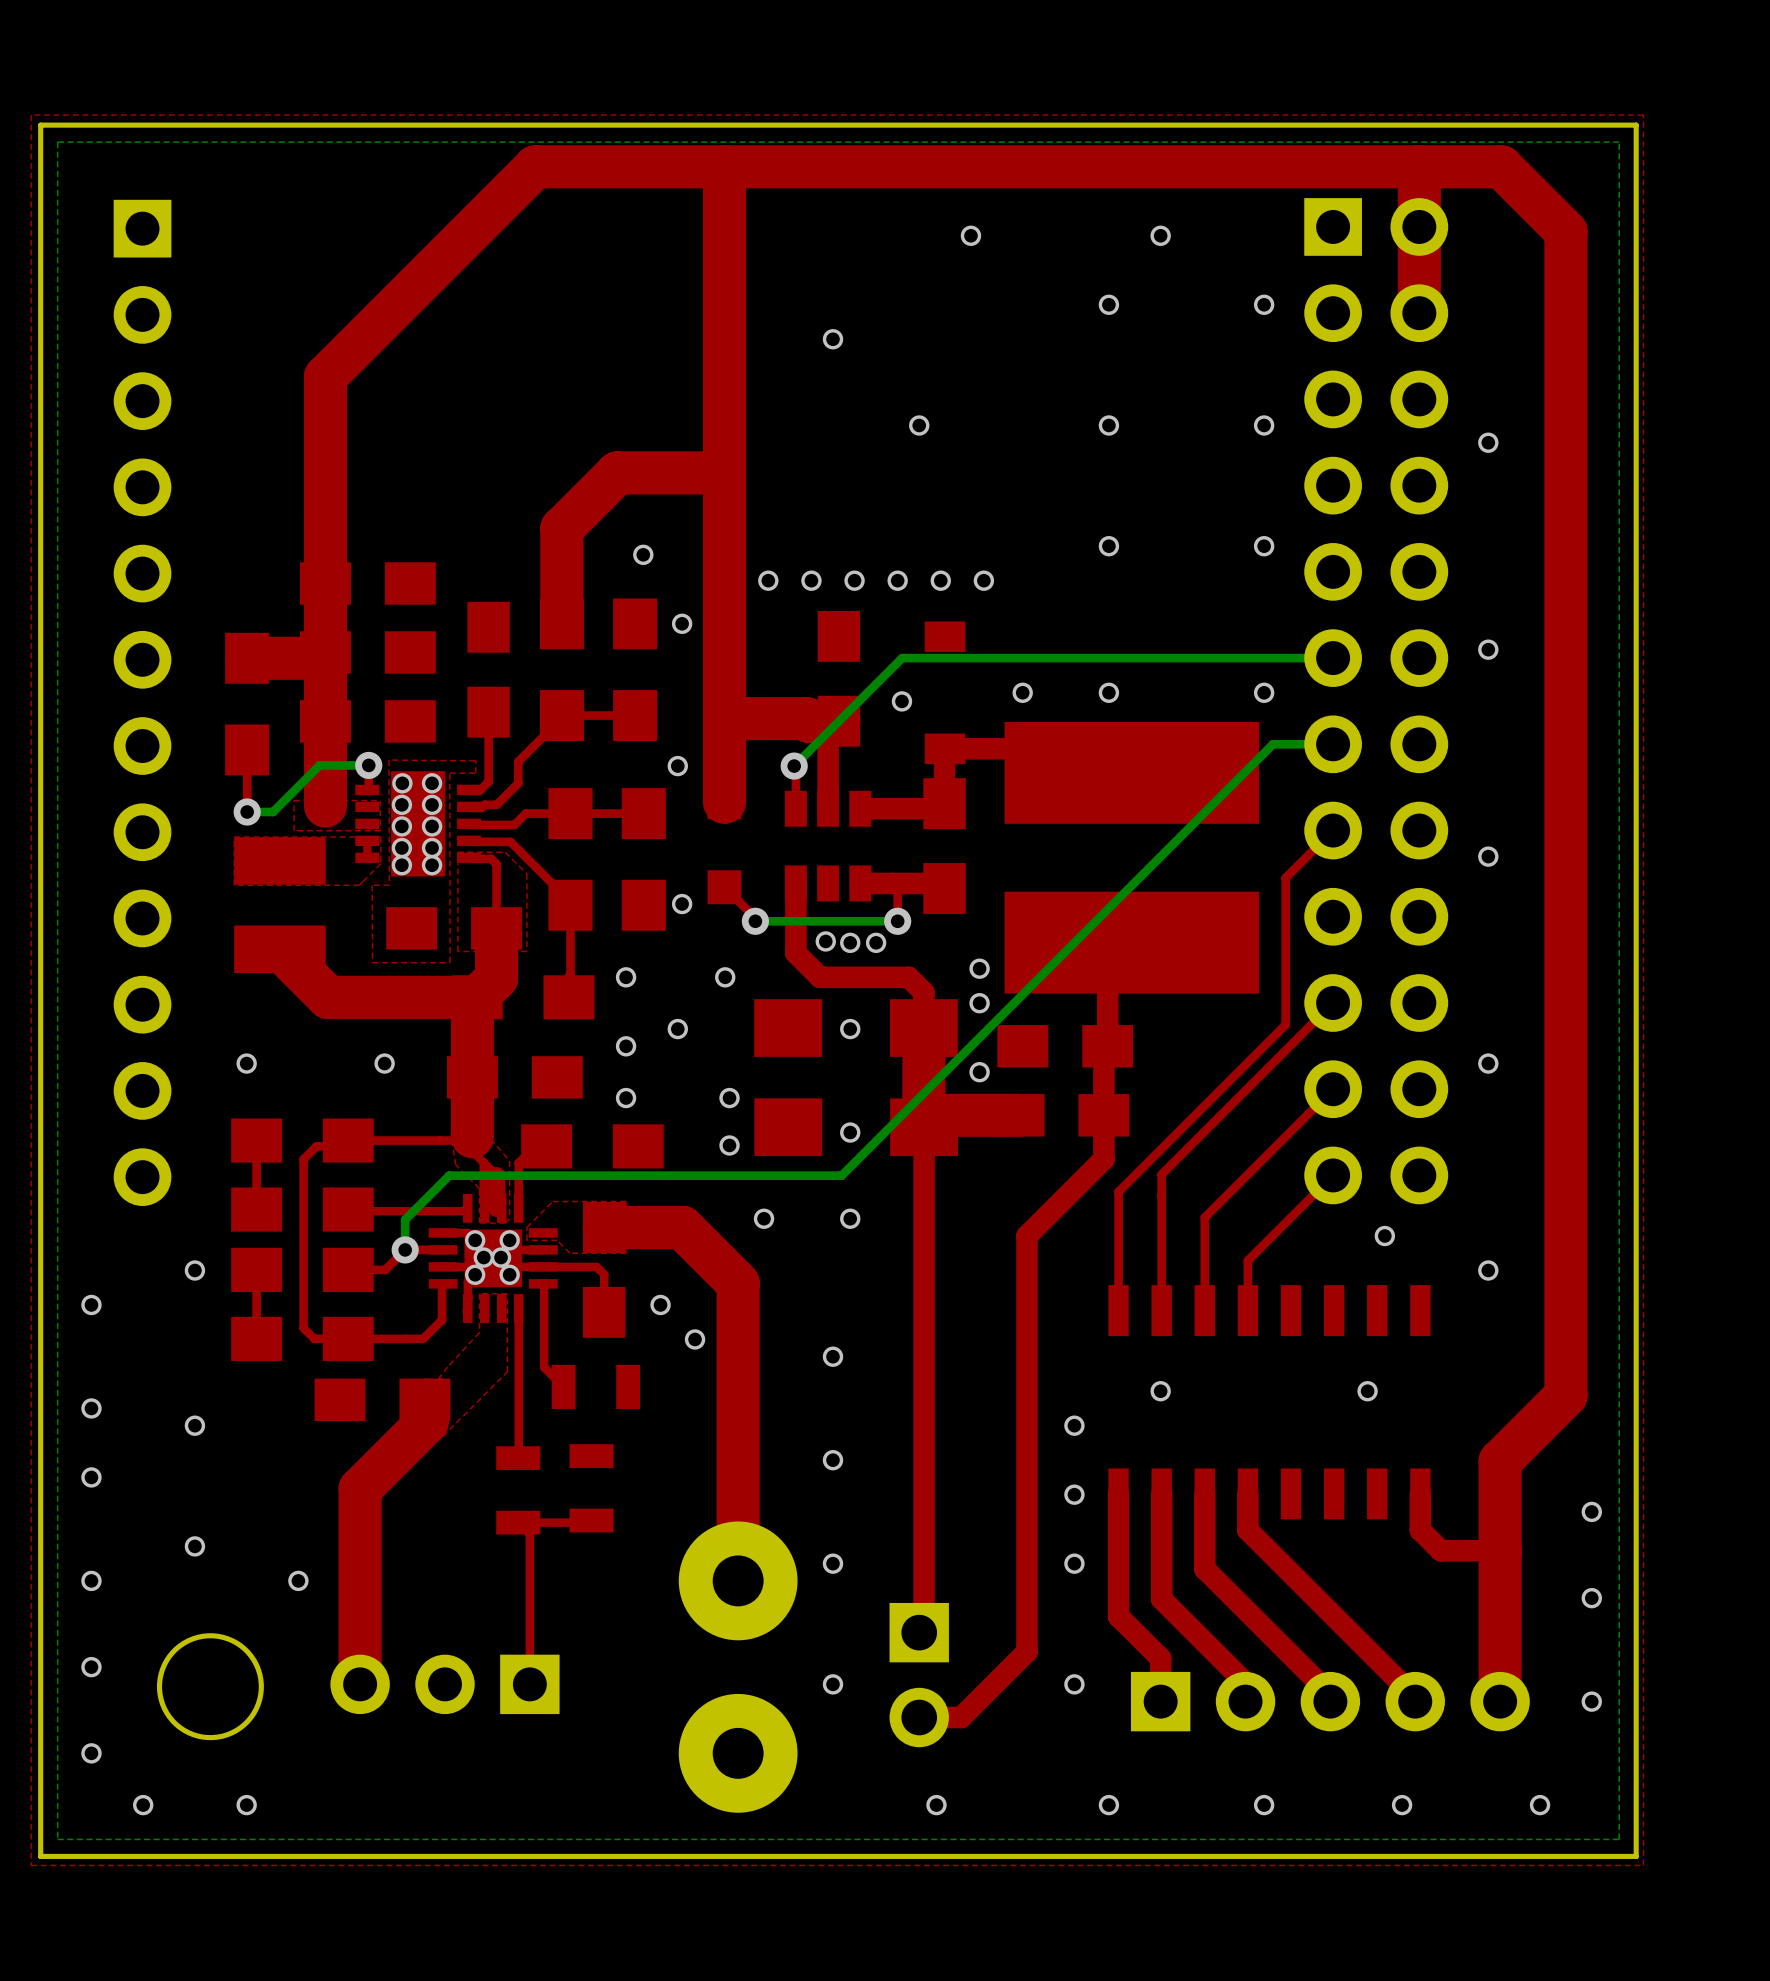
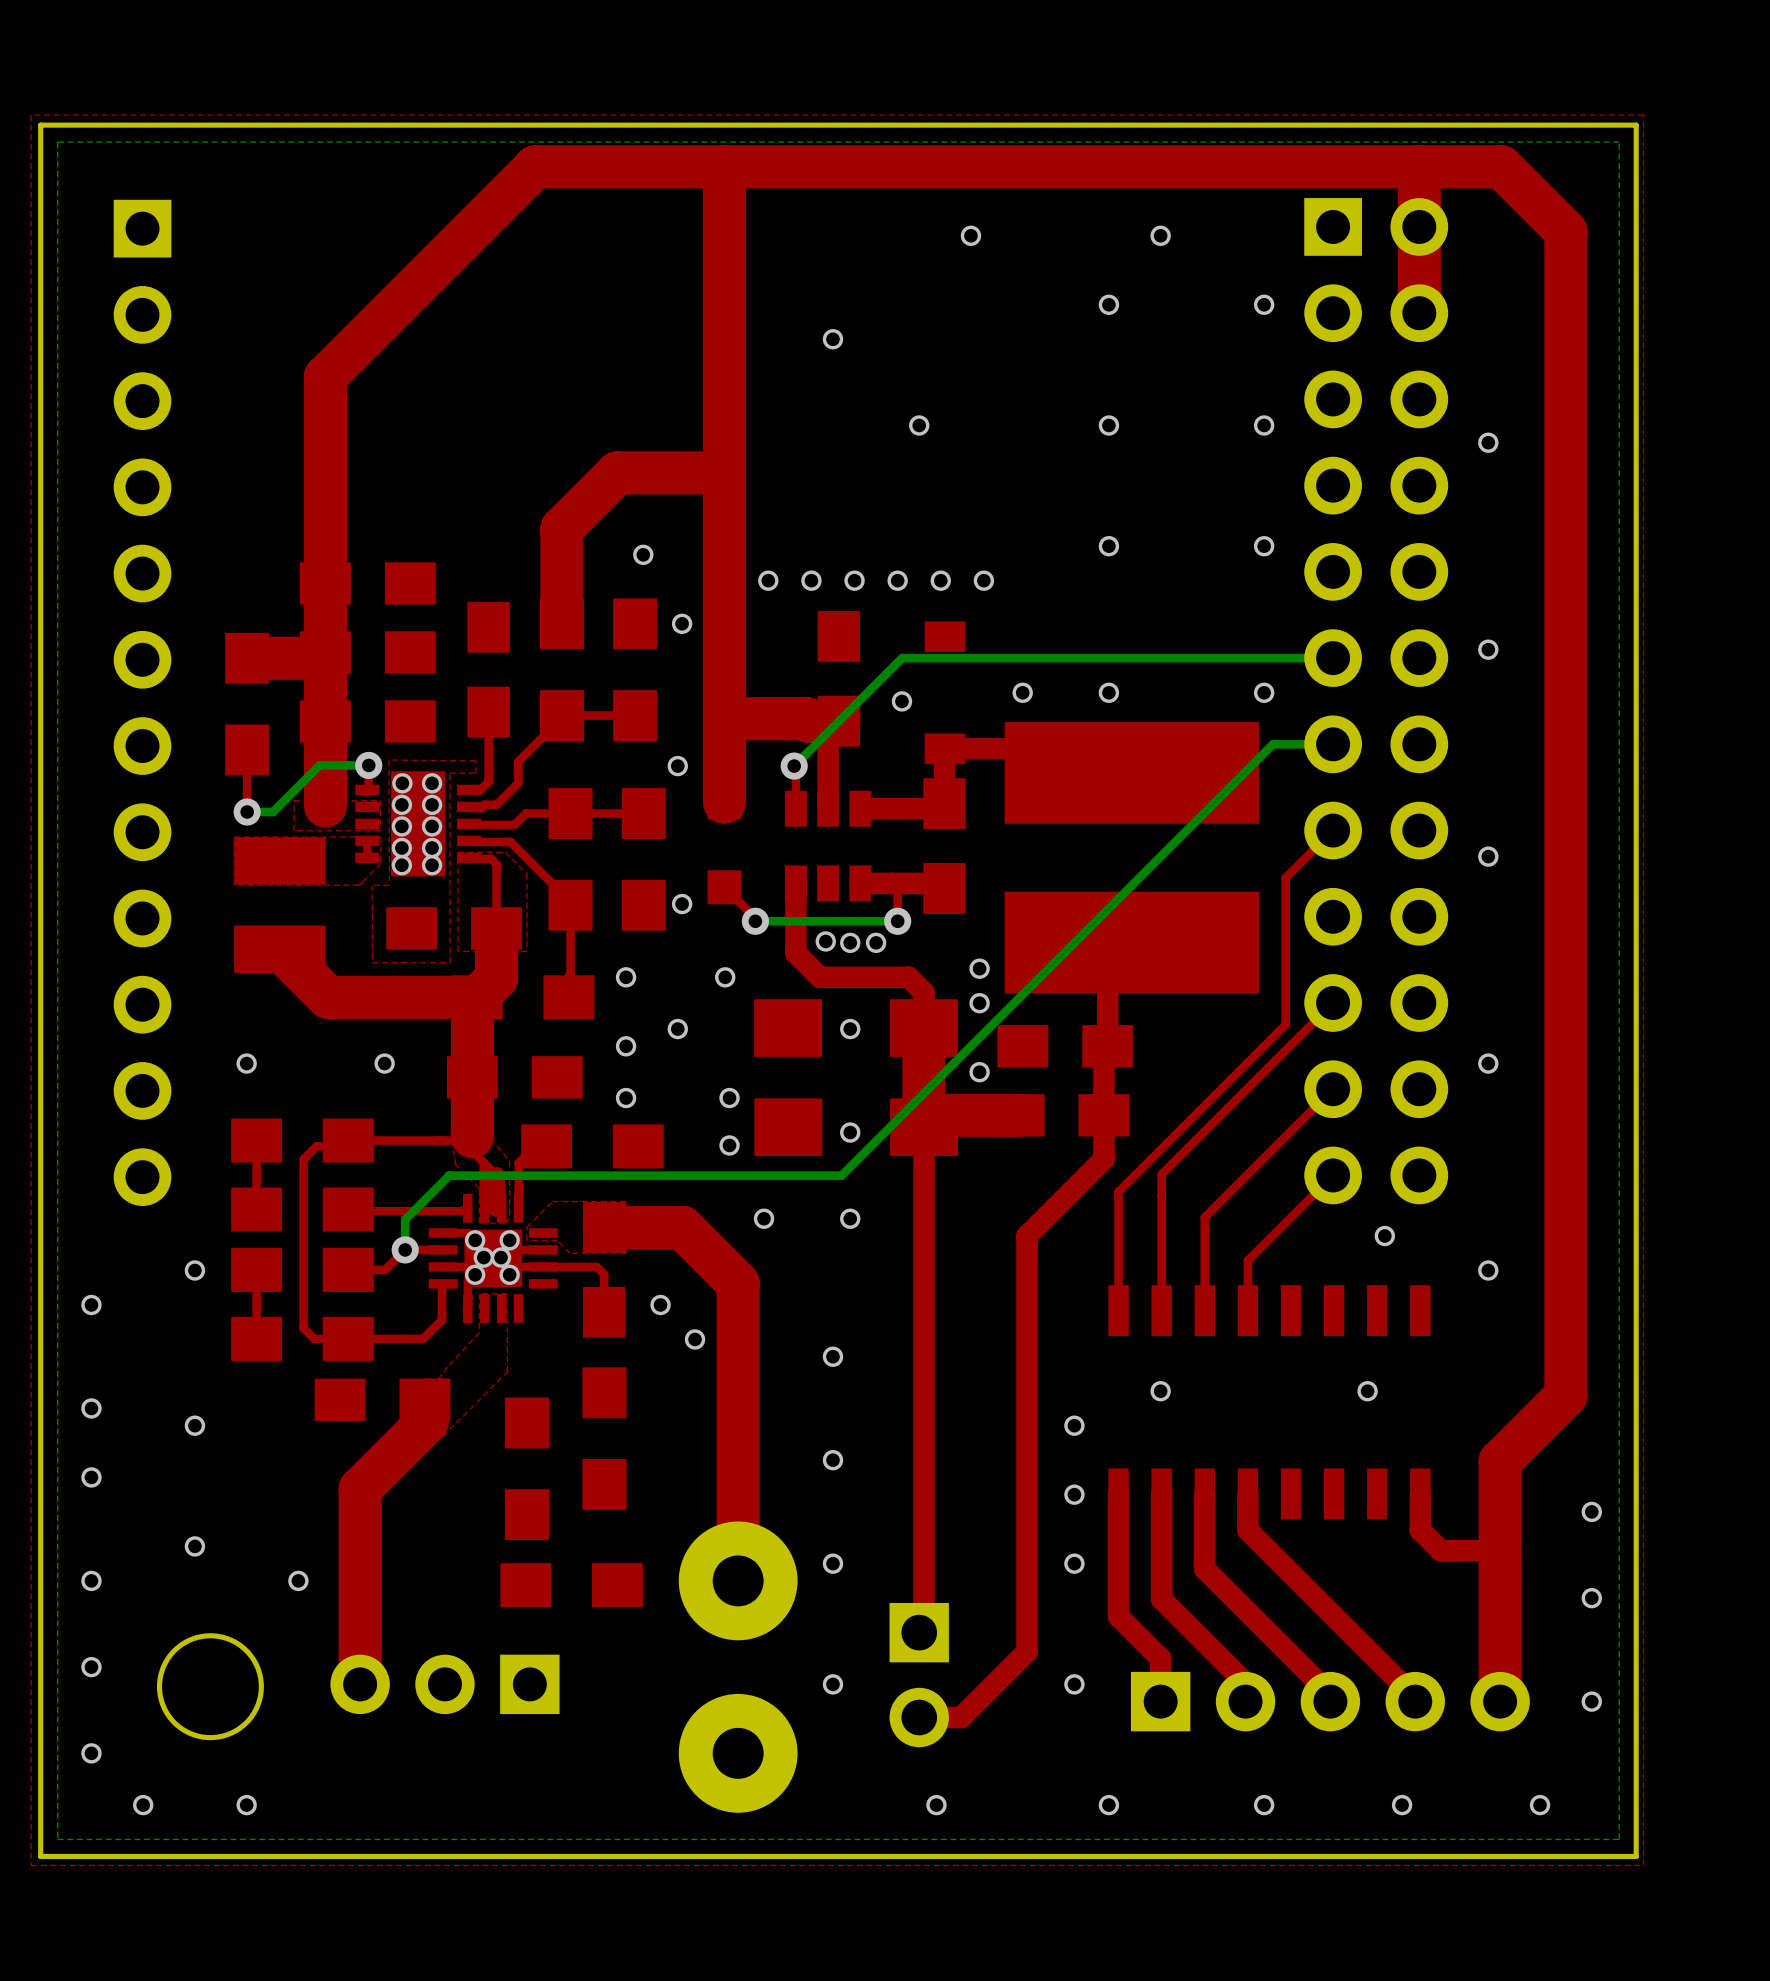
top track: (544, 1283) (544, 1367) (563, 1386) -> none
top track: (518, 1308) (518, 1457) -> none
part: (595, 1386) -> none
part: none -> (604, 1438)
part footprint: [496, 1446, 541, 1535] -> [504, 1397, 549, 1541]
part: (591, 1488) -> none
top track: (591, 1520) (589, 1522) (518, 1522) (529, 1534) (529, 1684) -> none
part: none -> (571, 1585)

